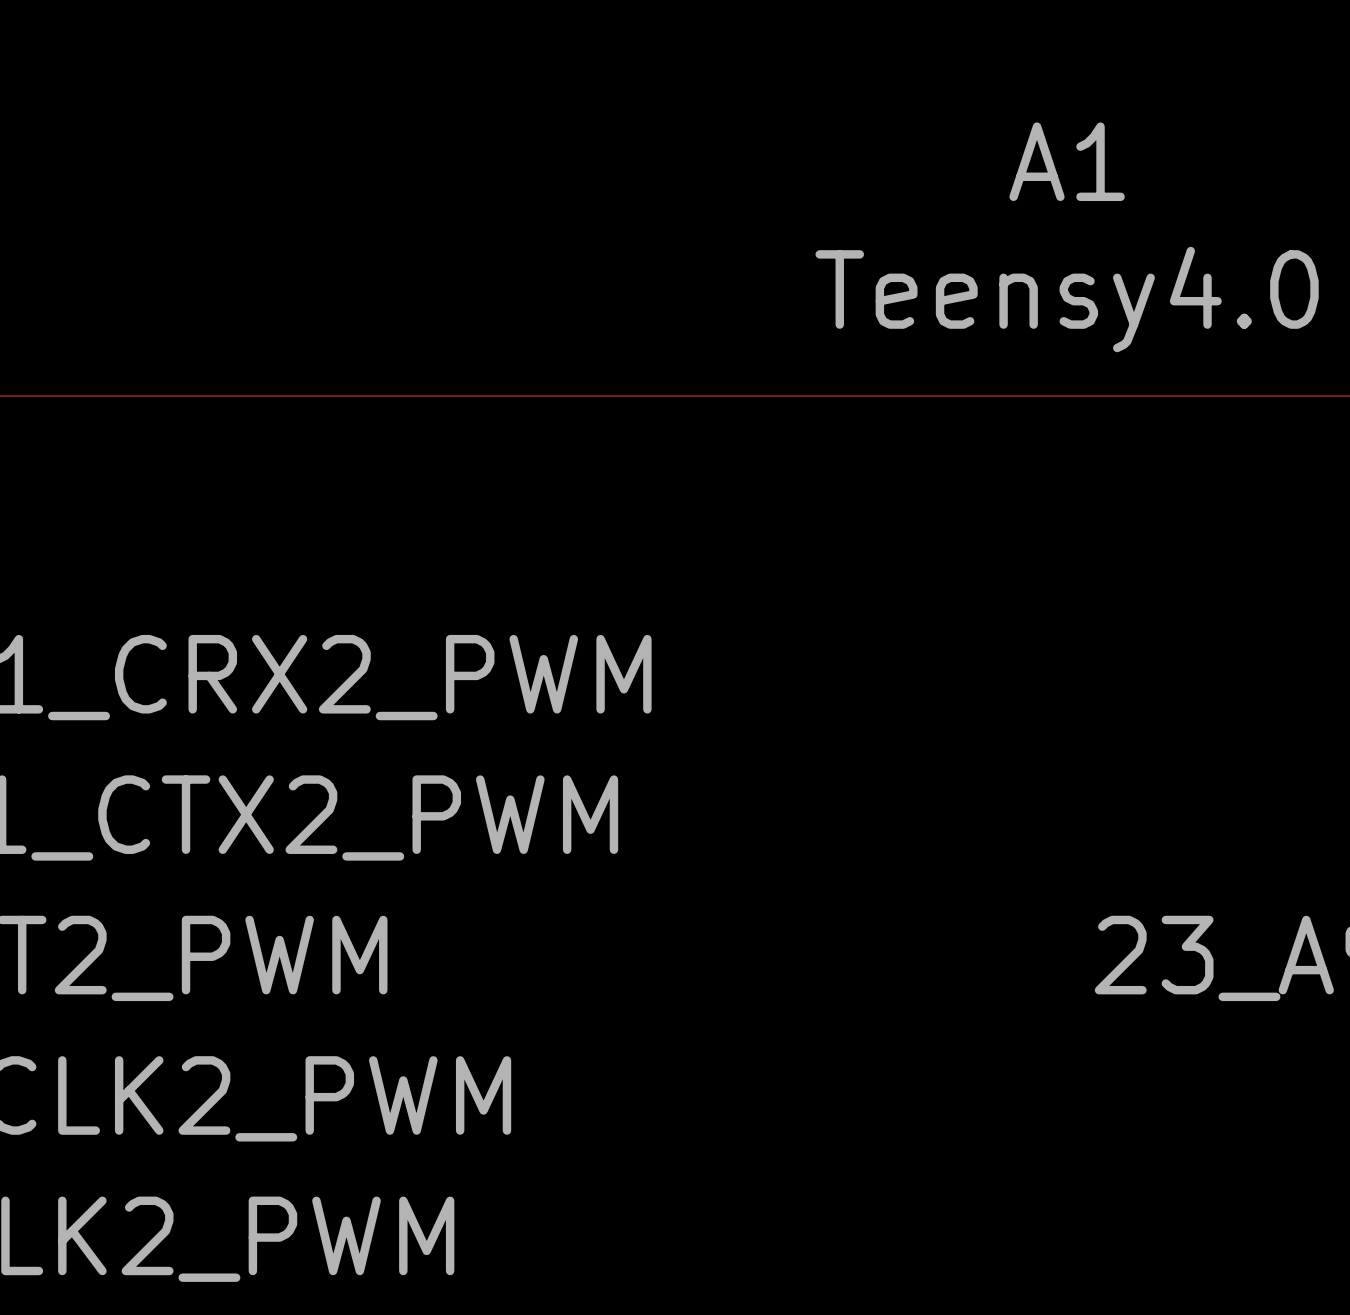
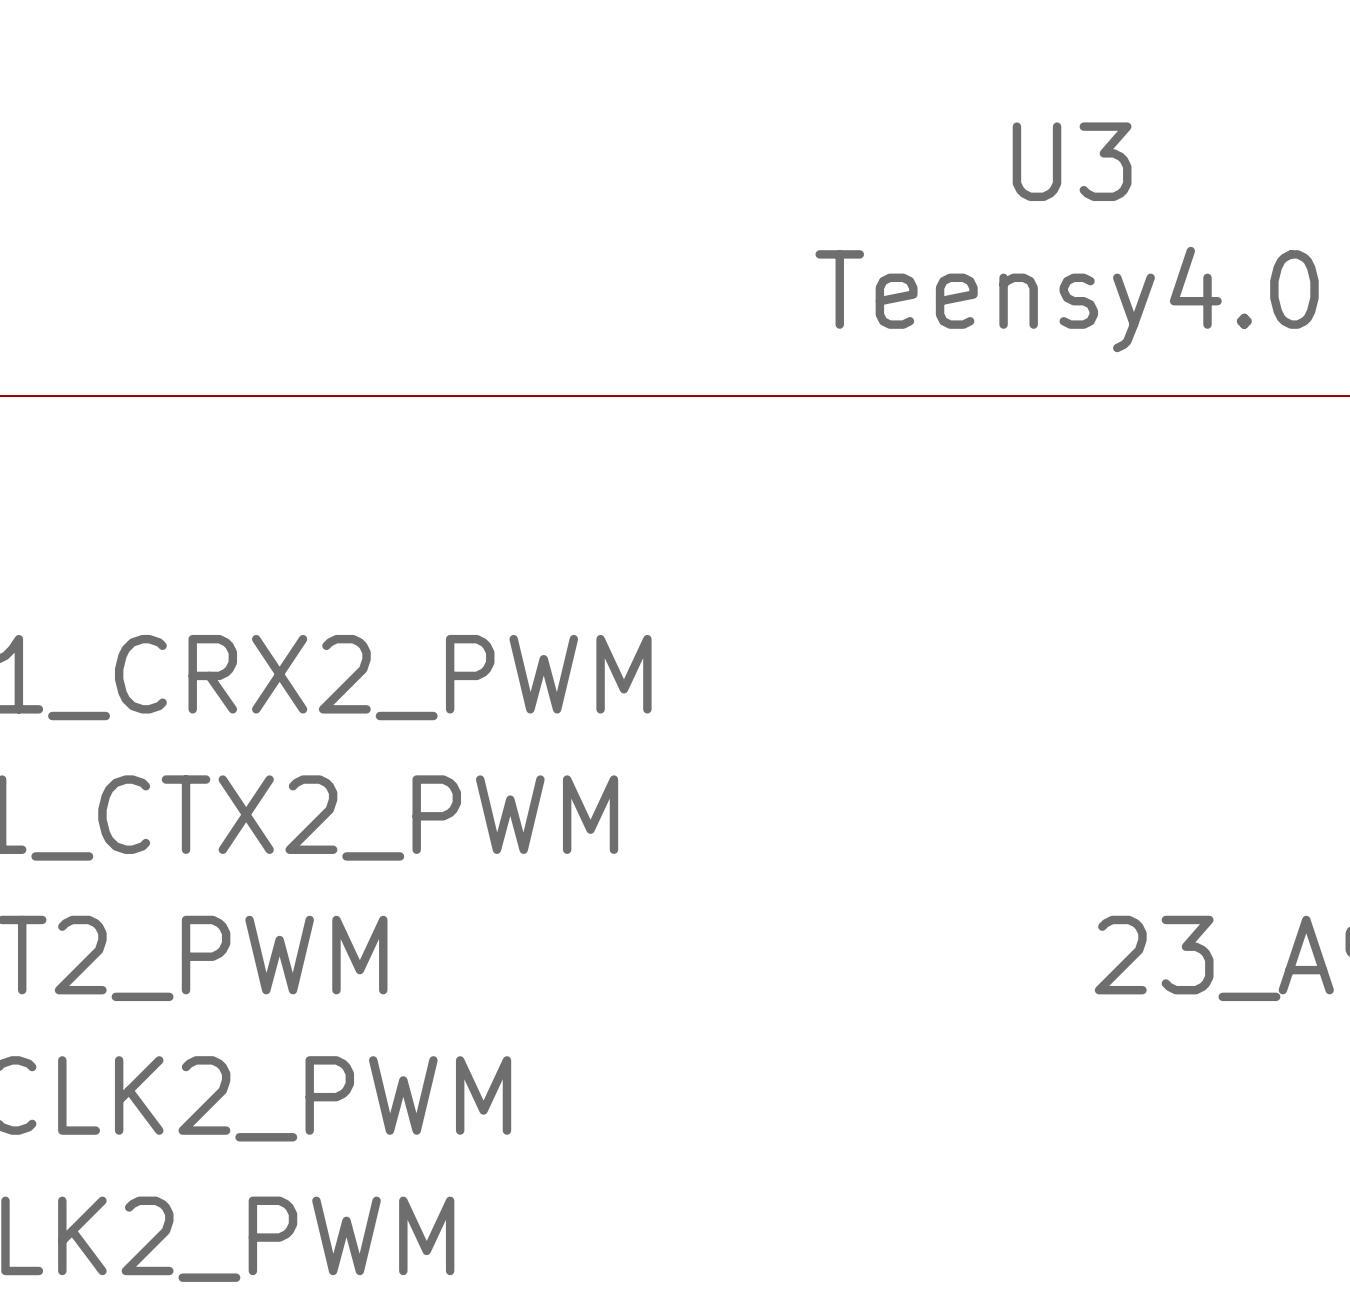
A1 name: A1 (1067, 161) -> U3 (1072, 161)

